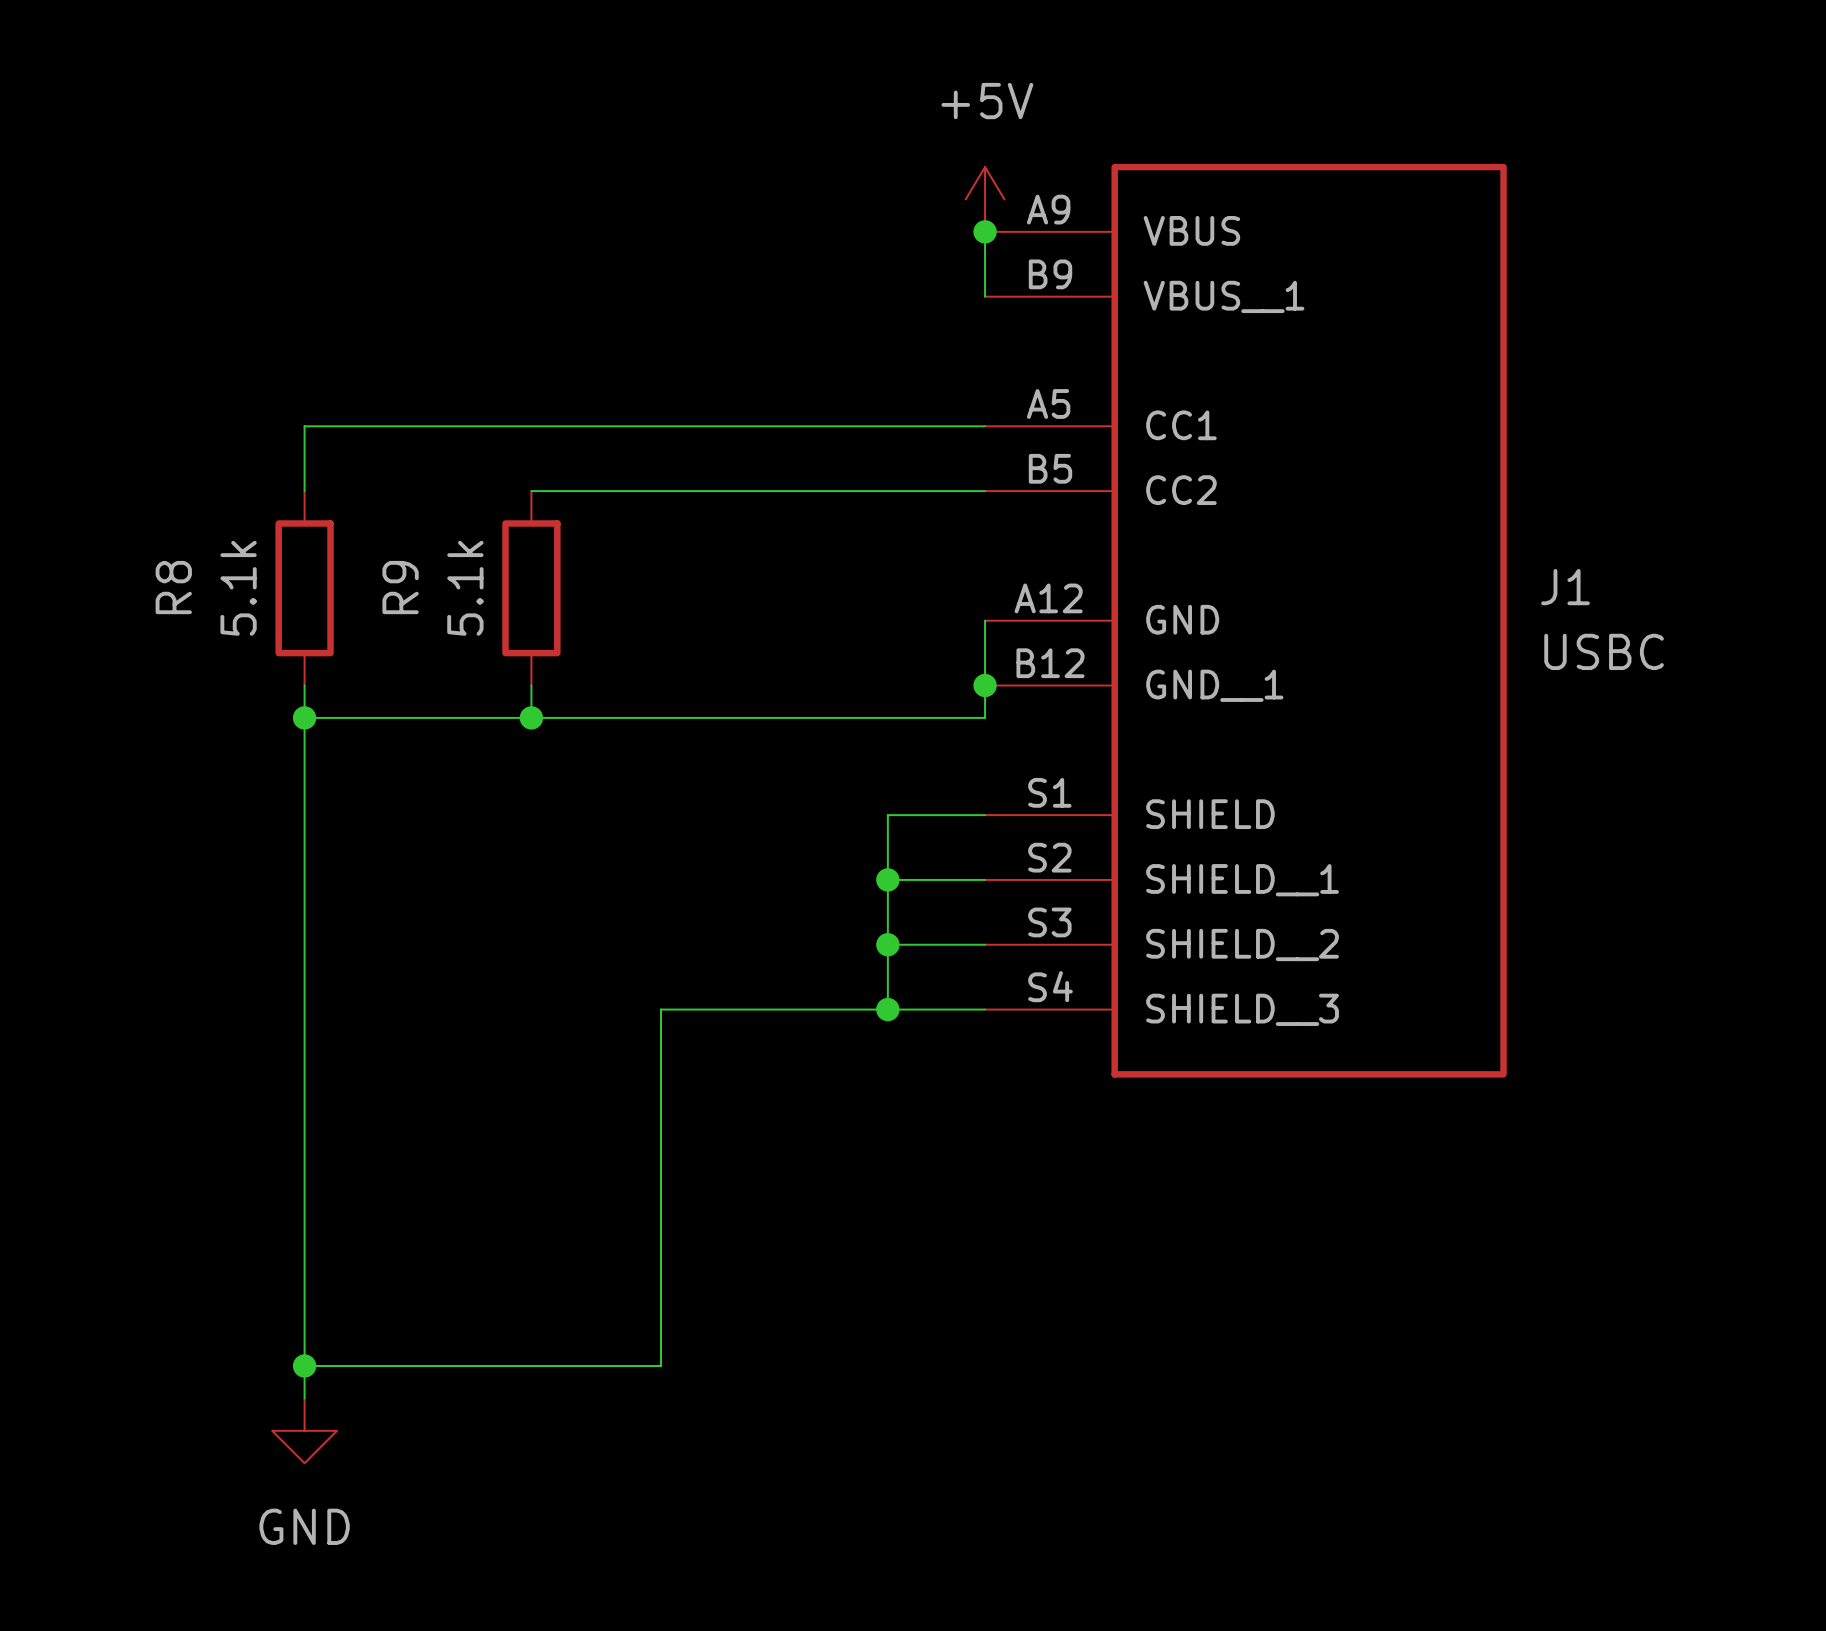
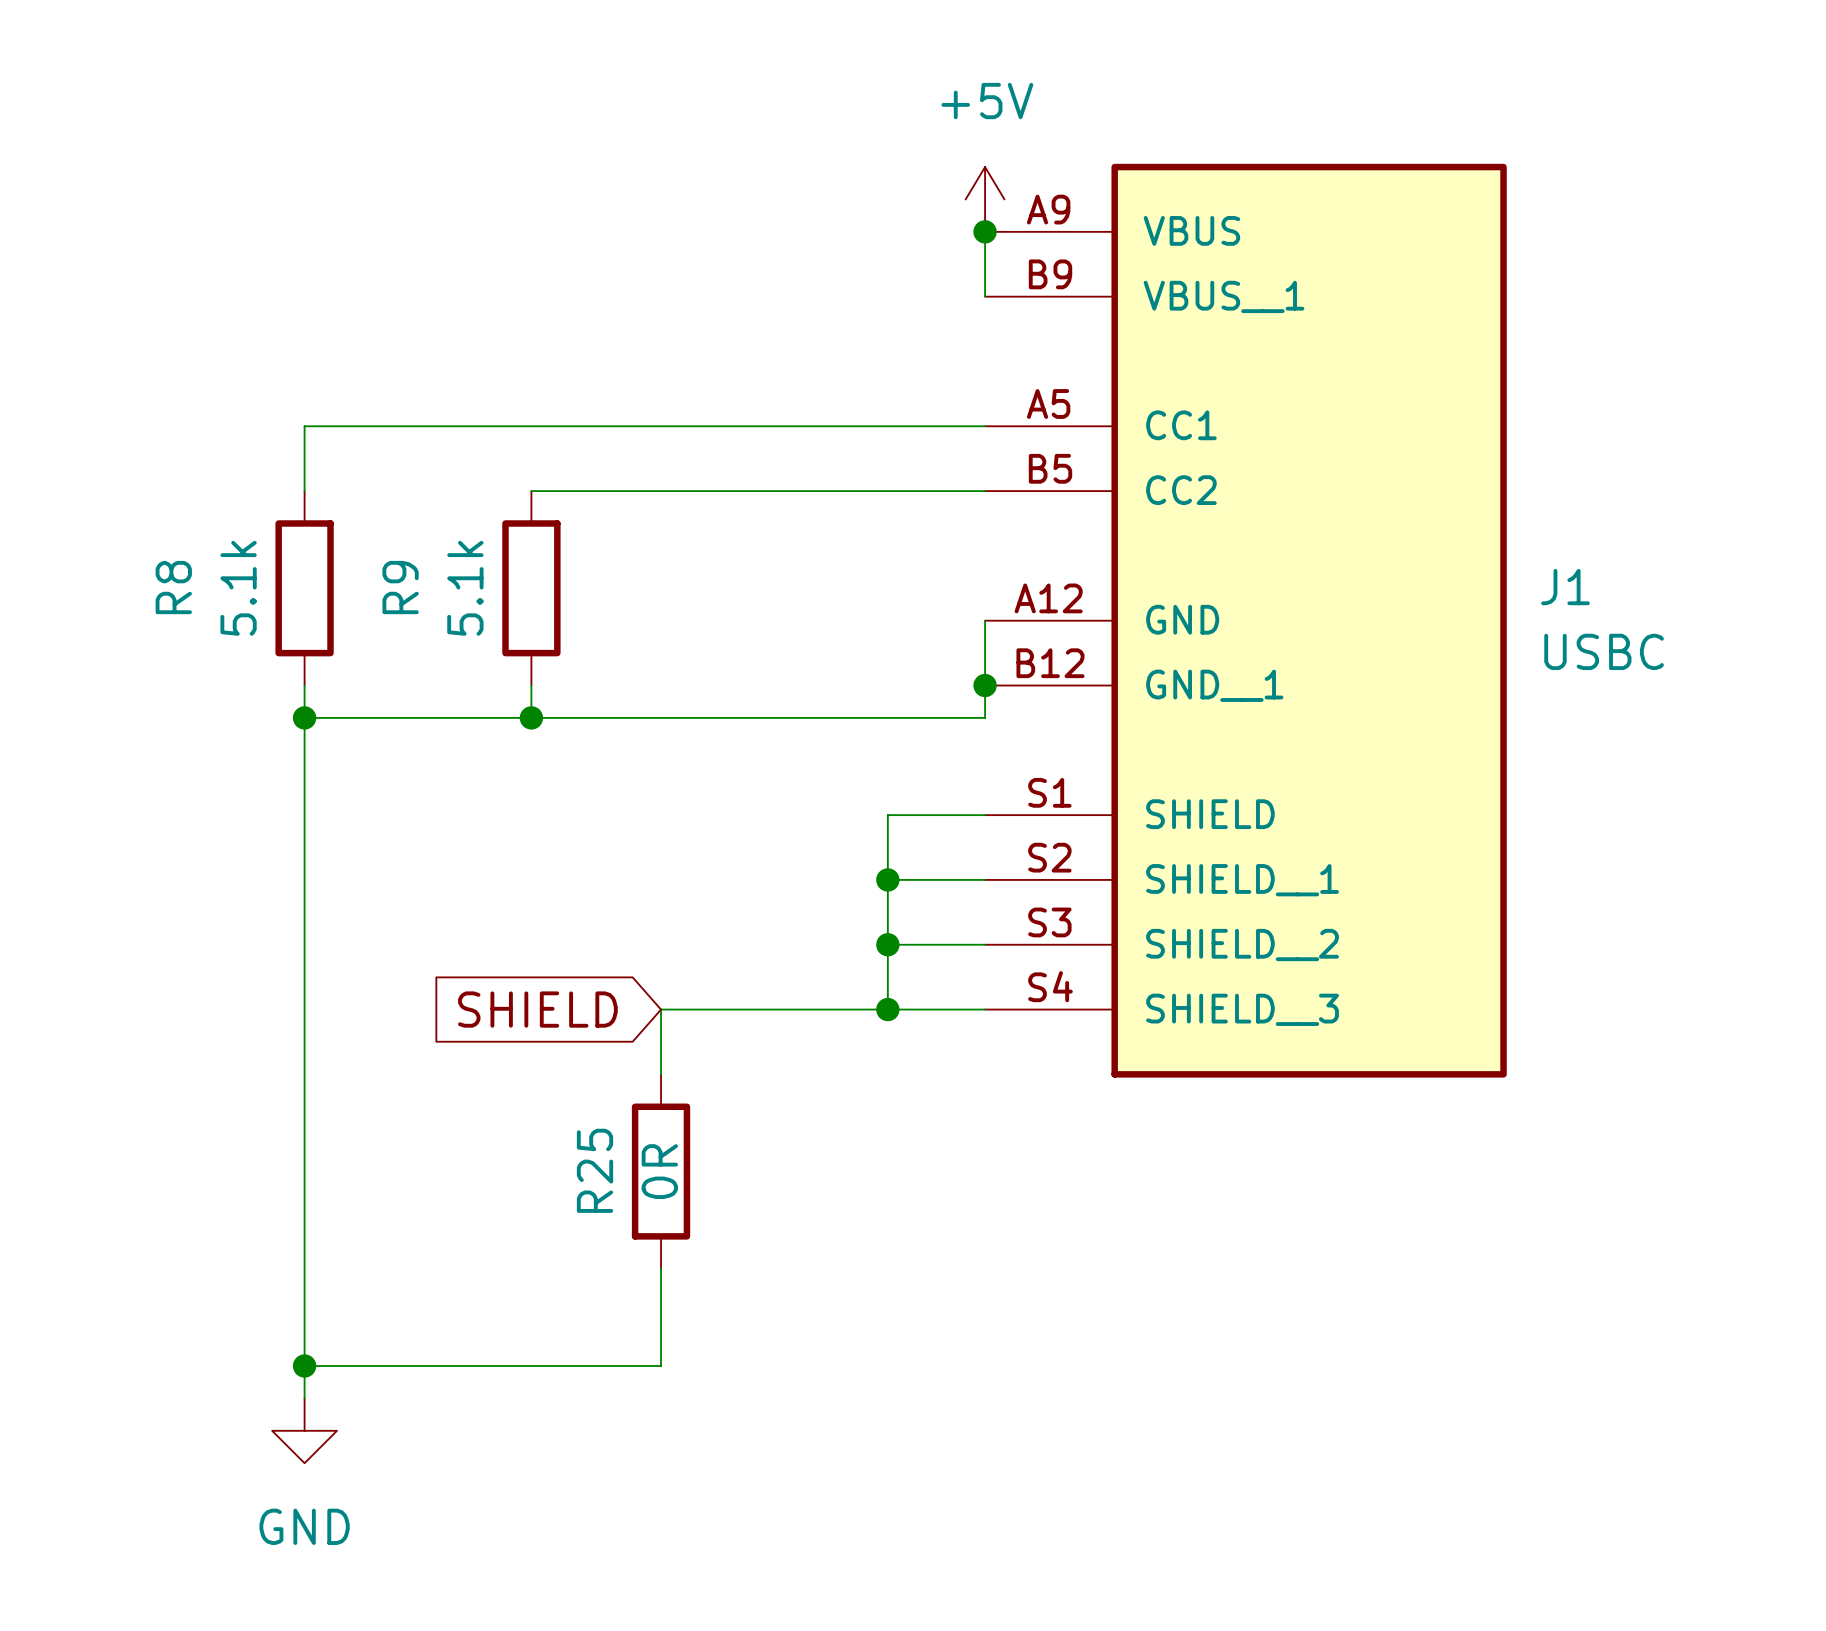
global label: none -> SHIELD (537, 1009)
wire: (661, 1074) (661, 1268) -> none
R25: none -> 0R (661, 1171)

